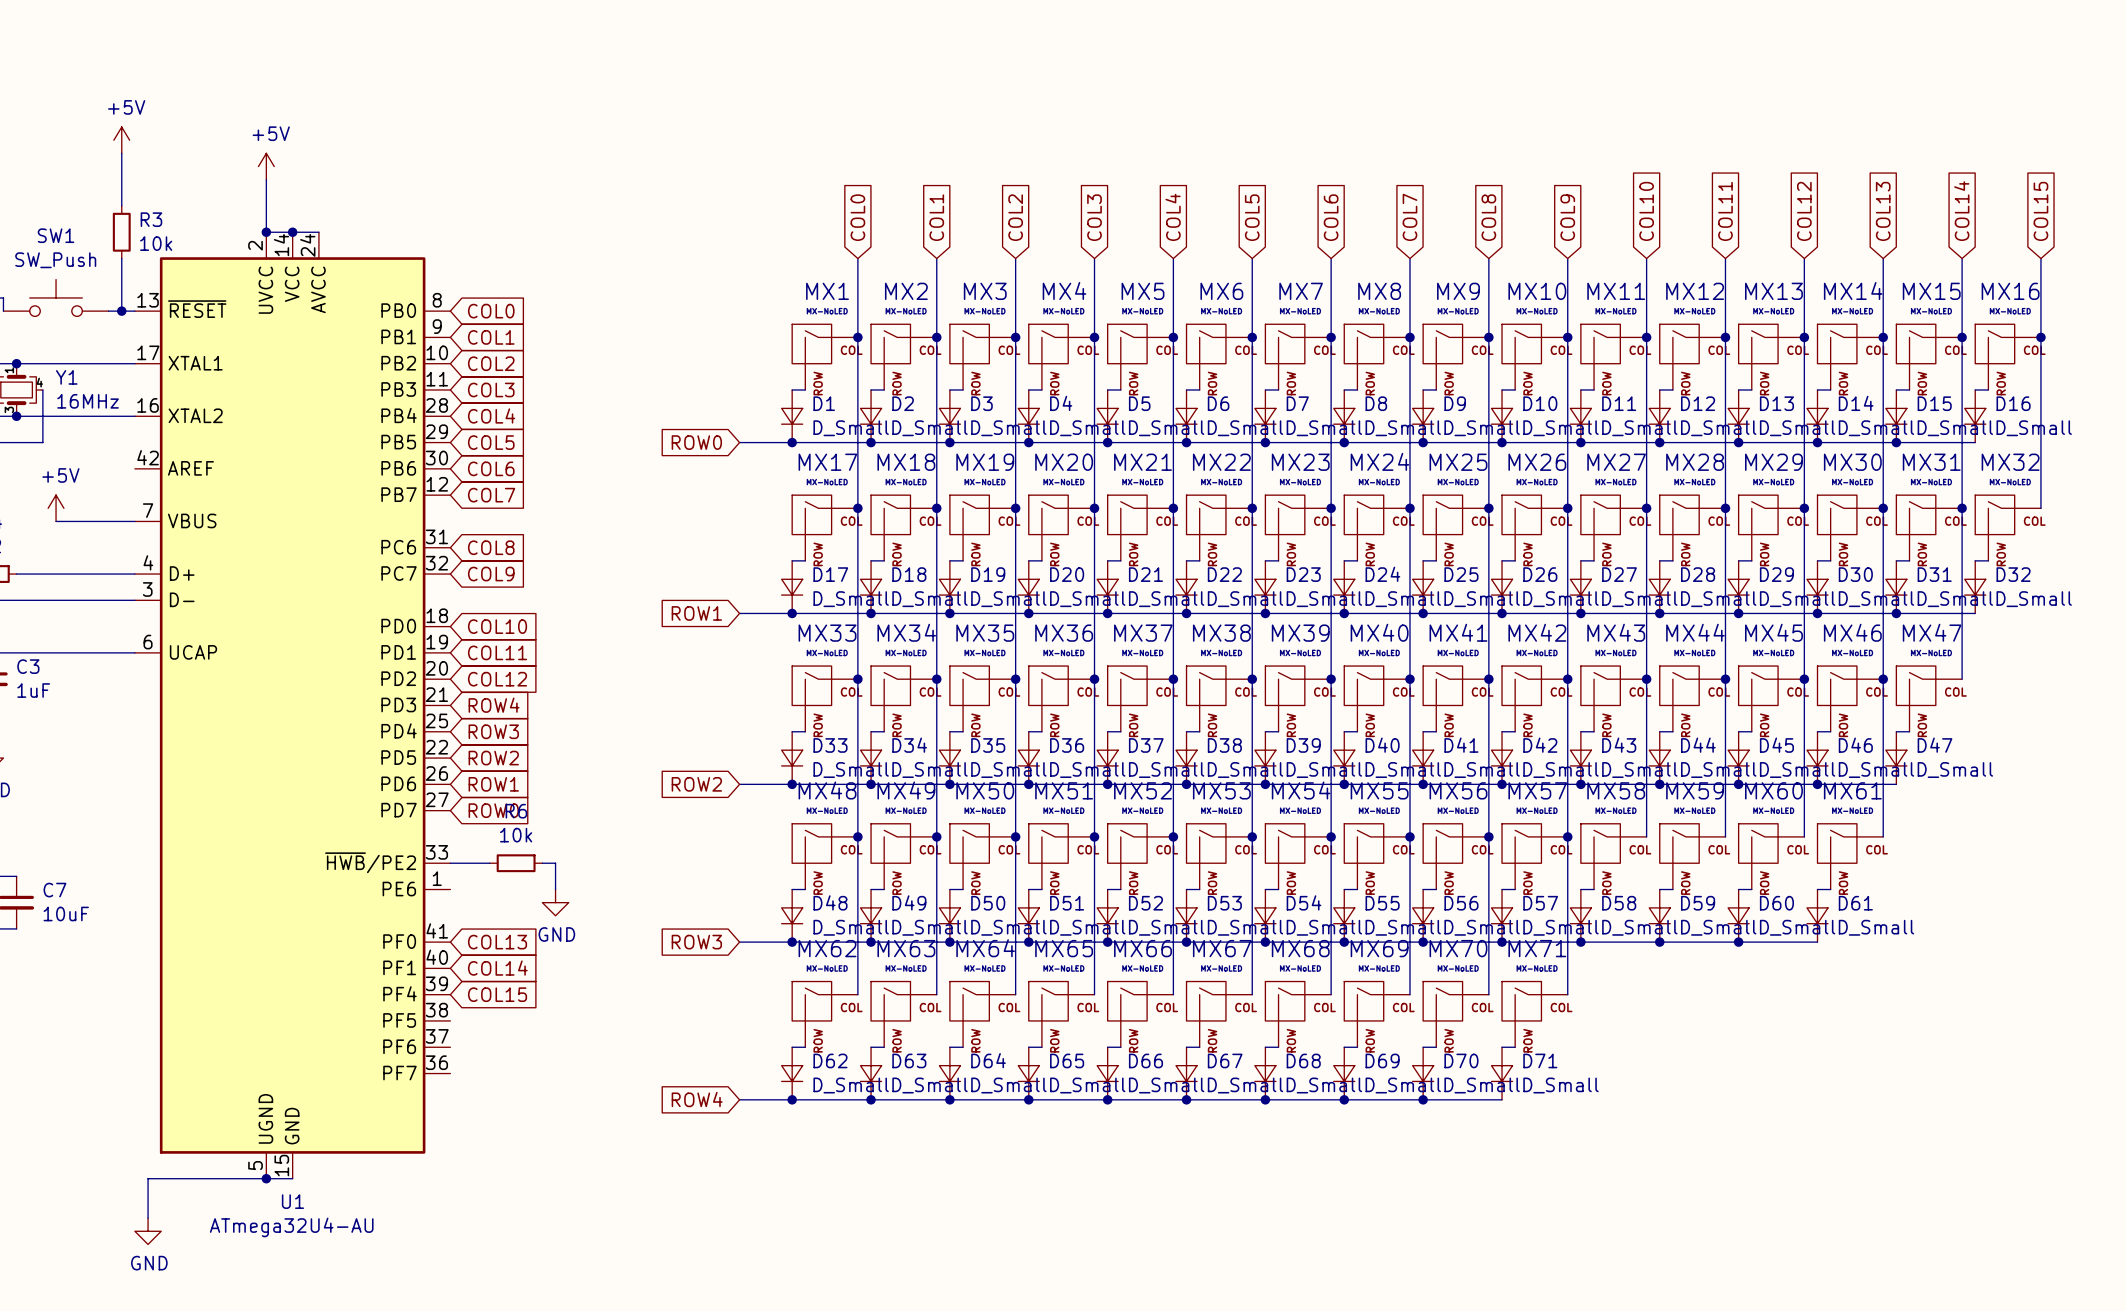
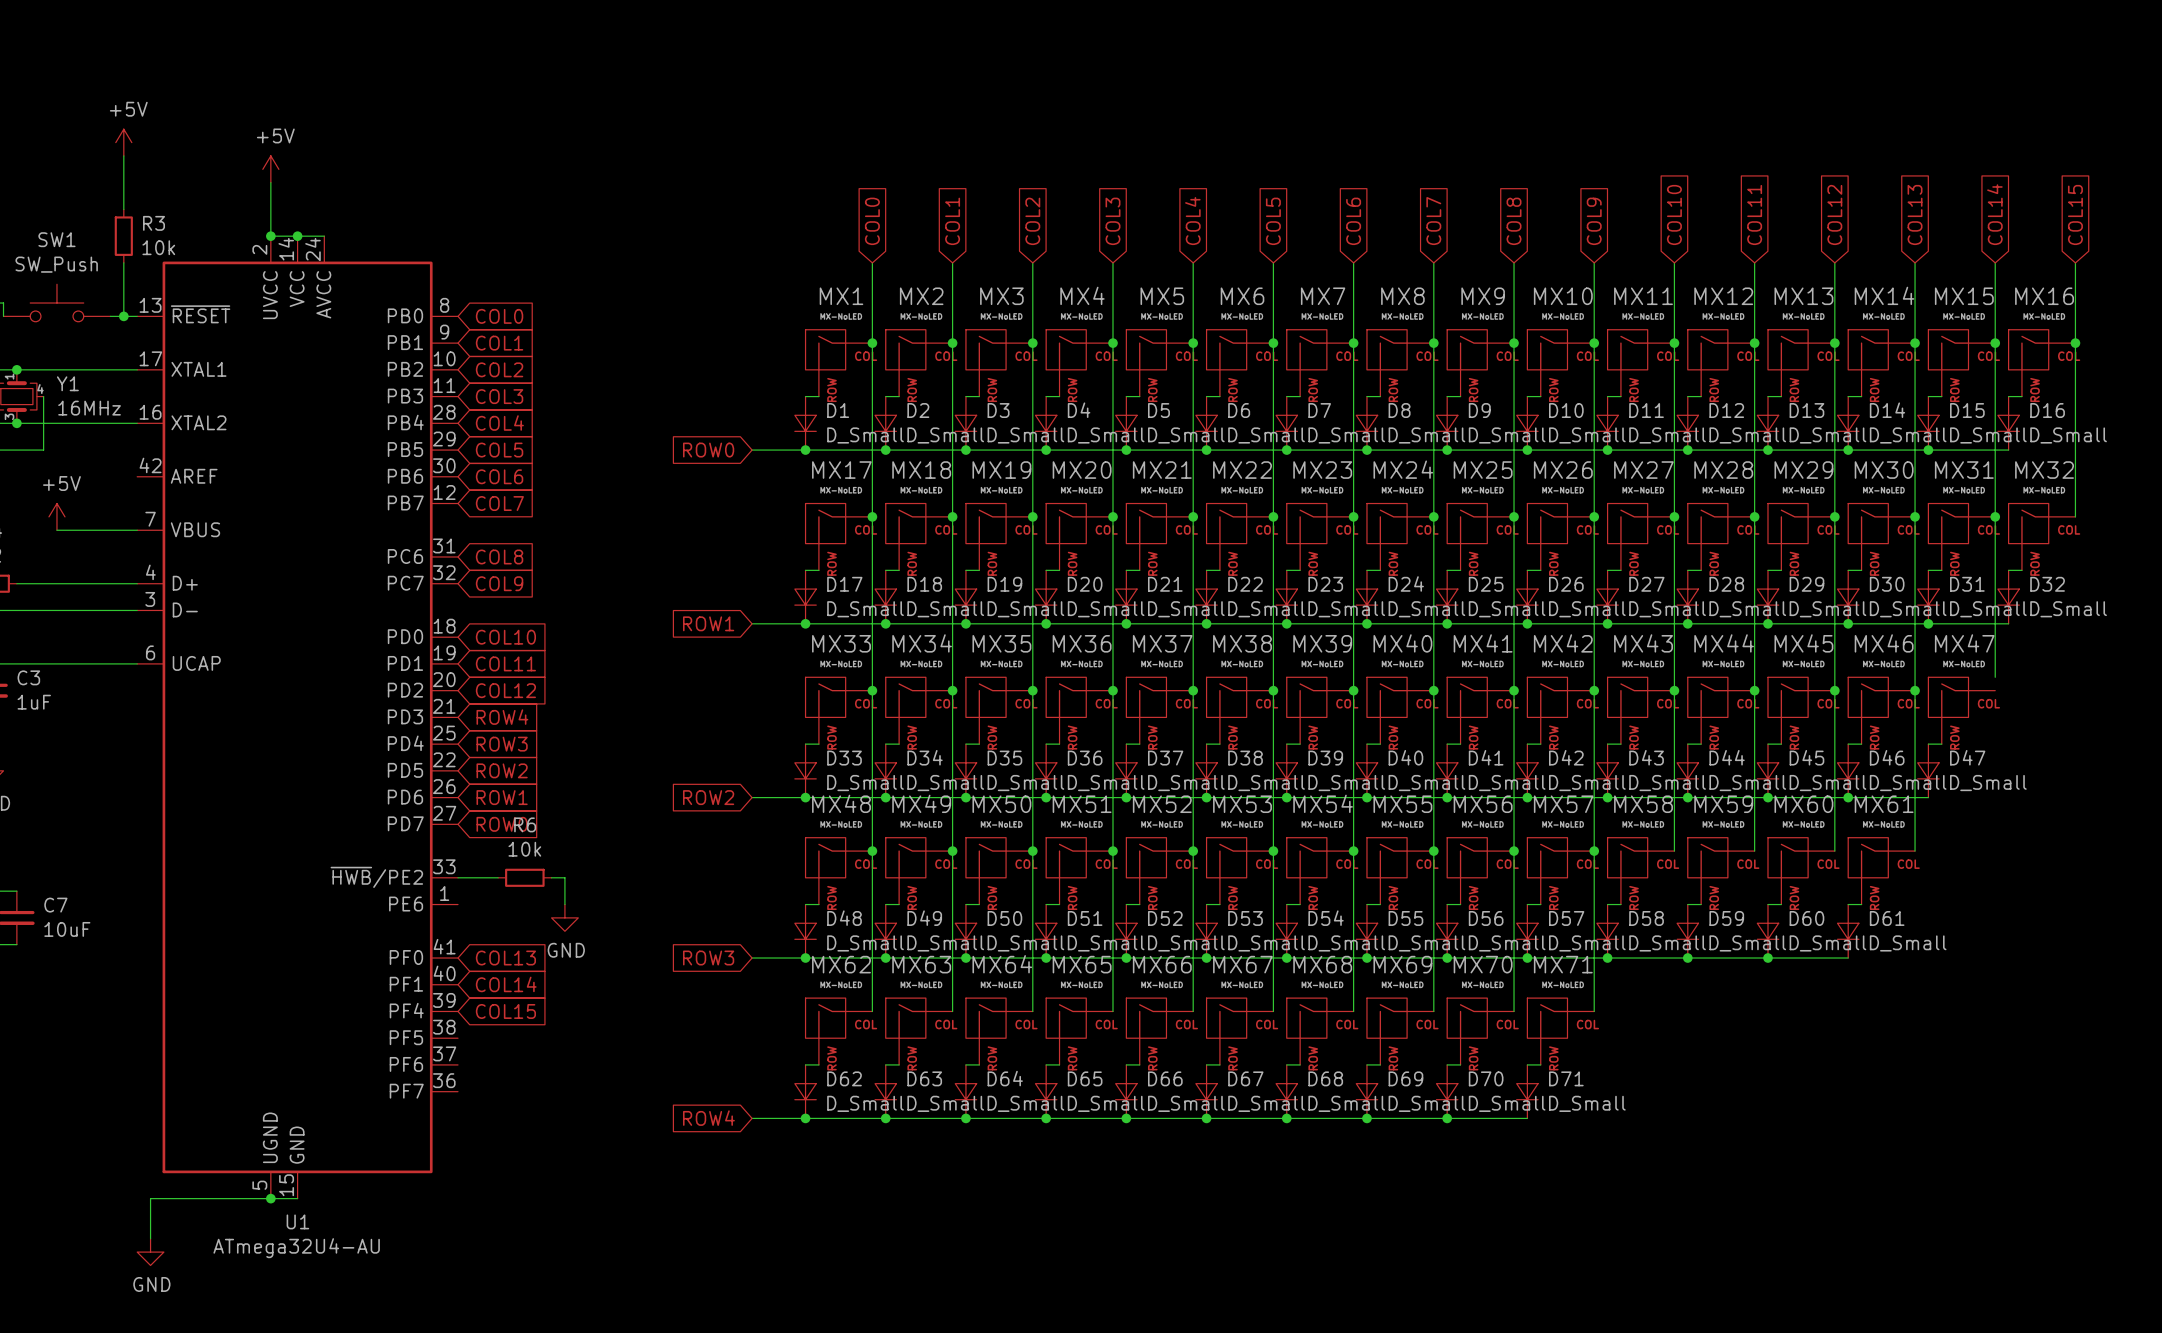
wire: (1962, 666) (1962, 679) -> none

